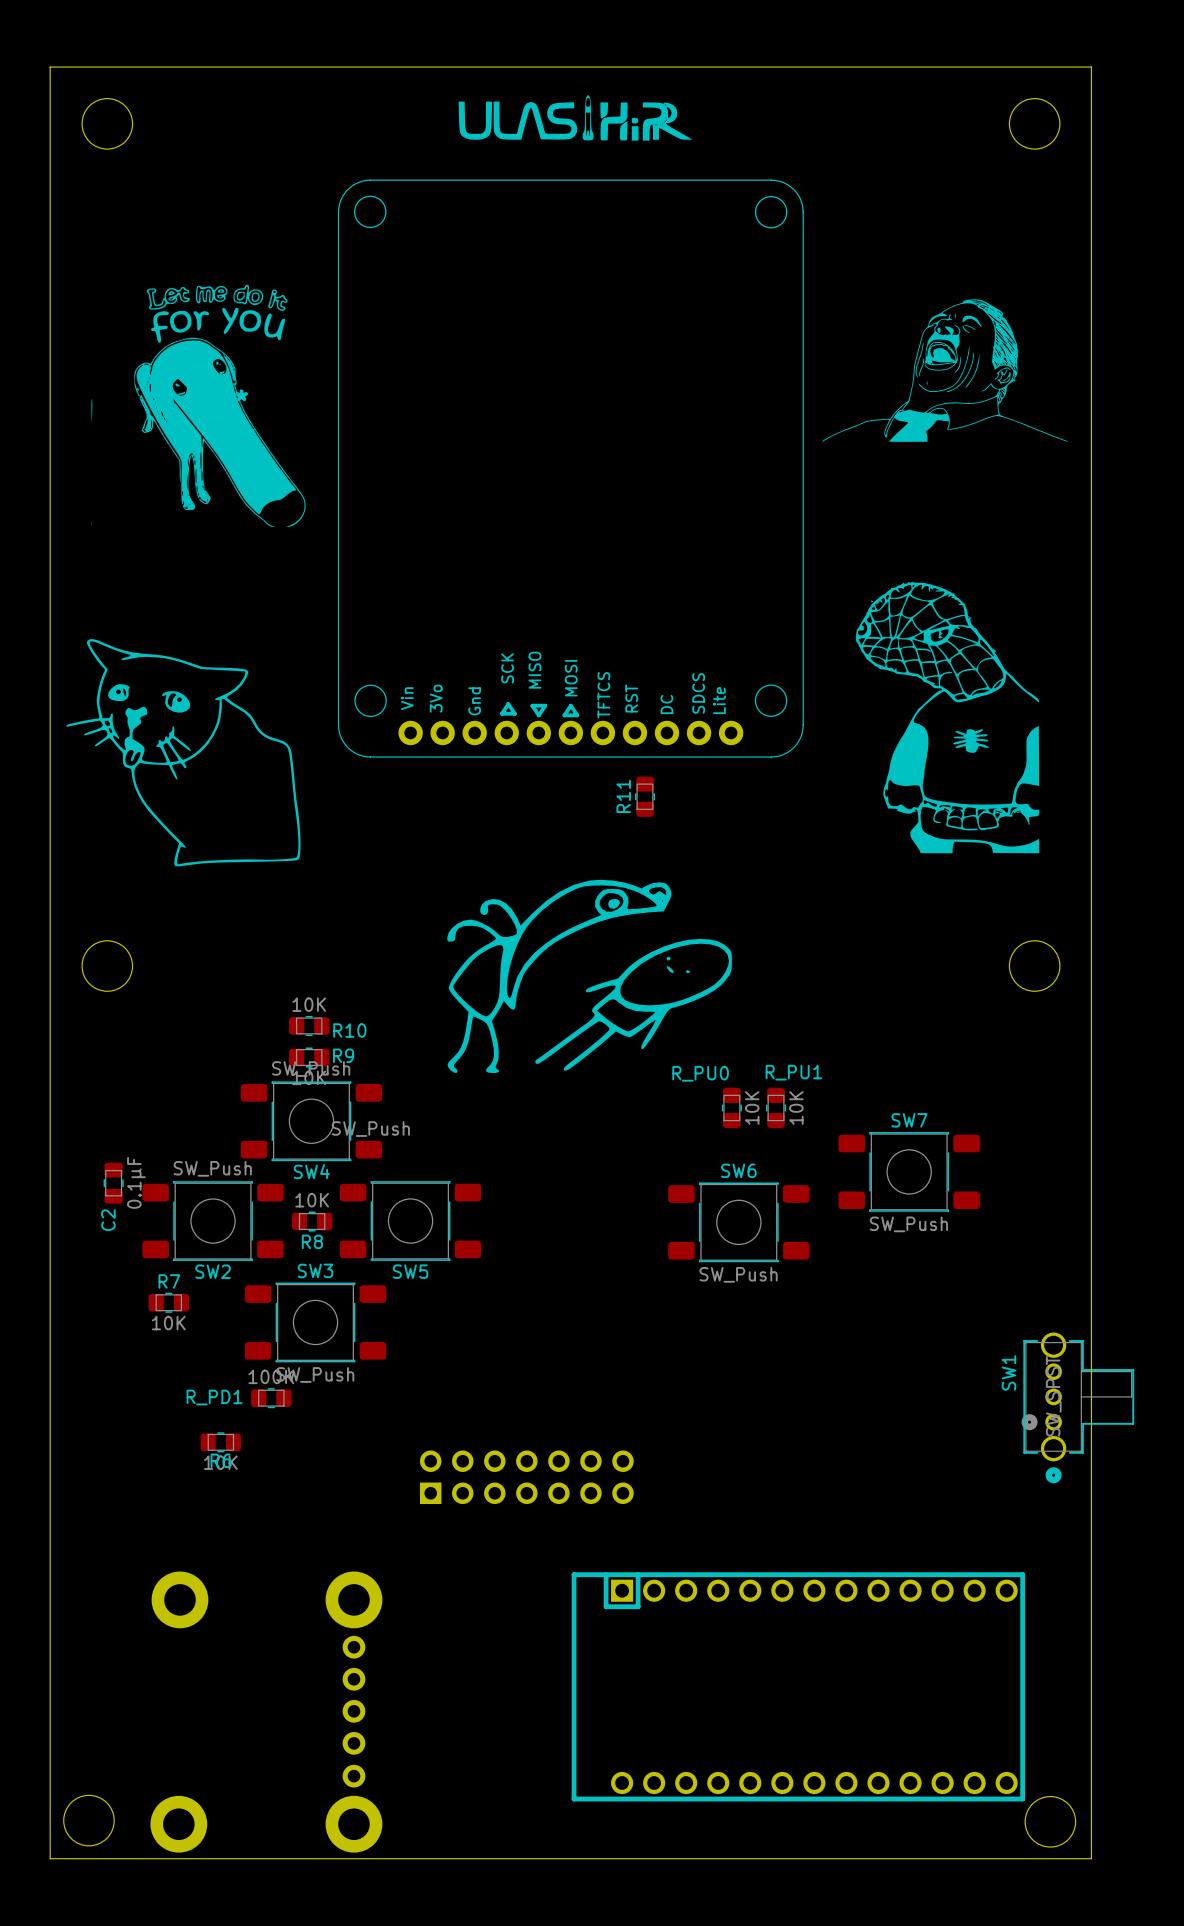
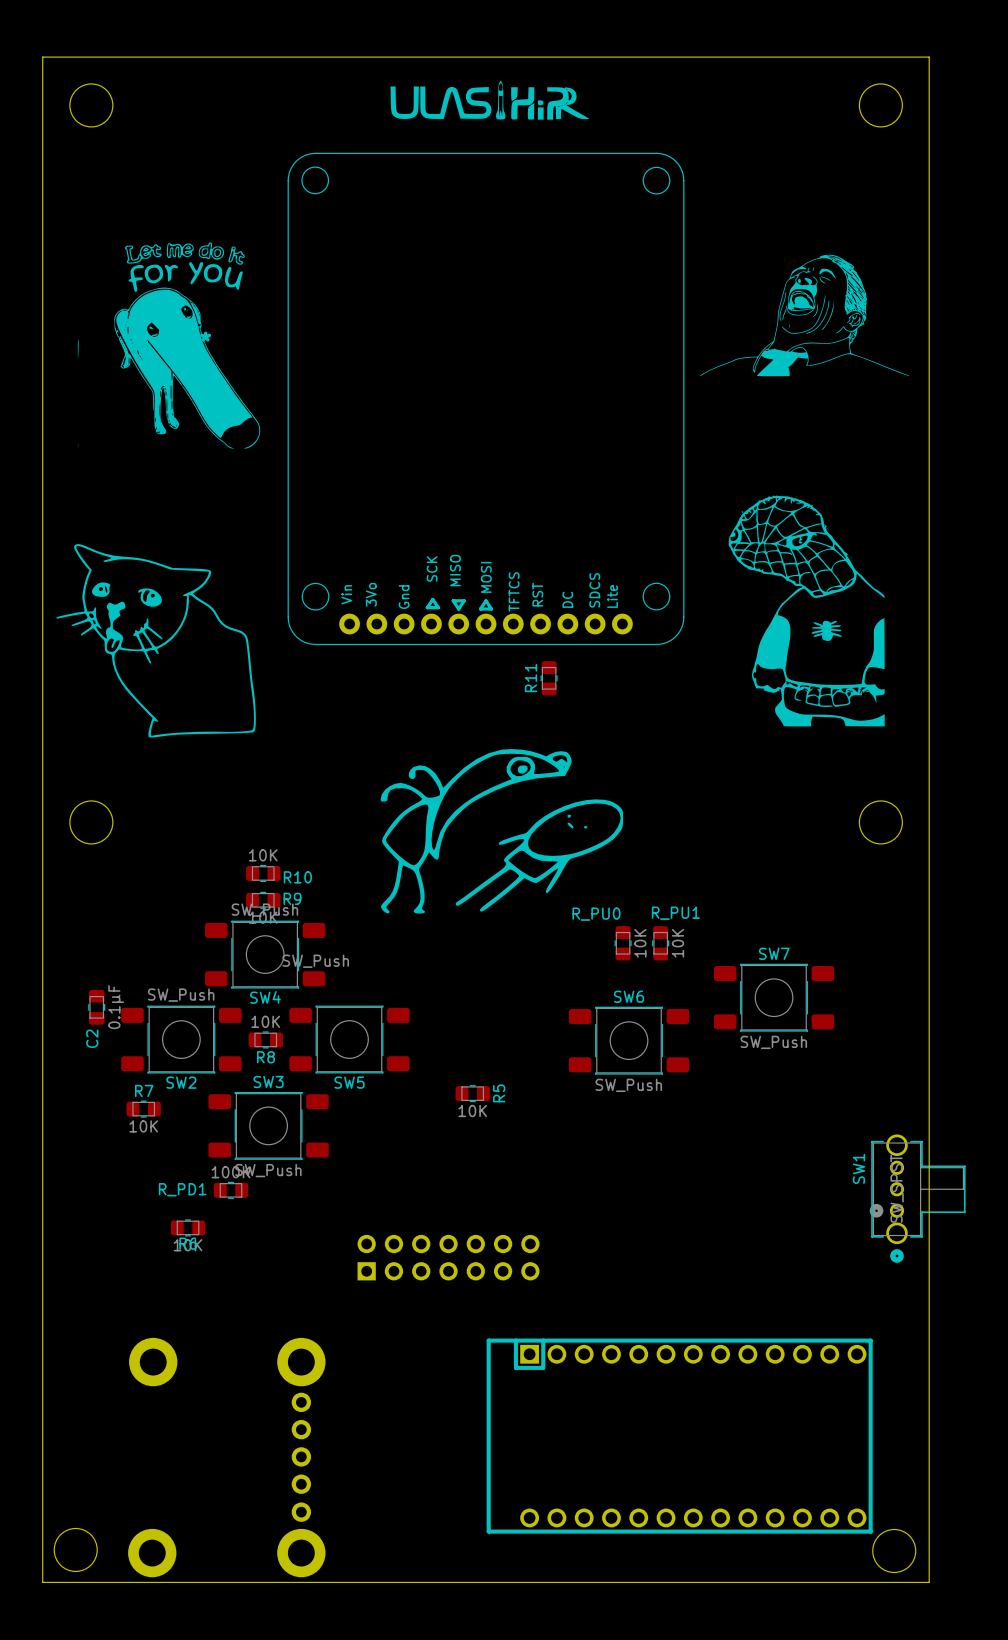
R5: none -> 10K (472, 1093)

